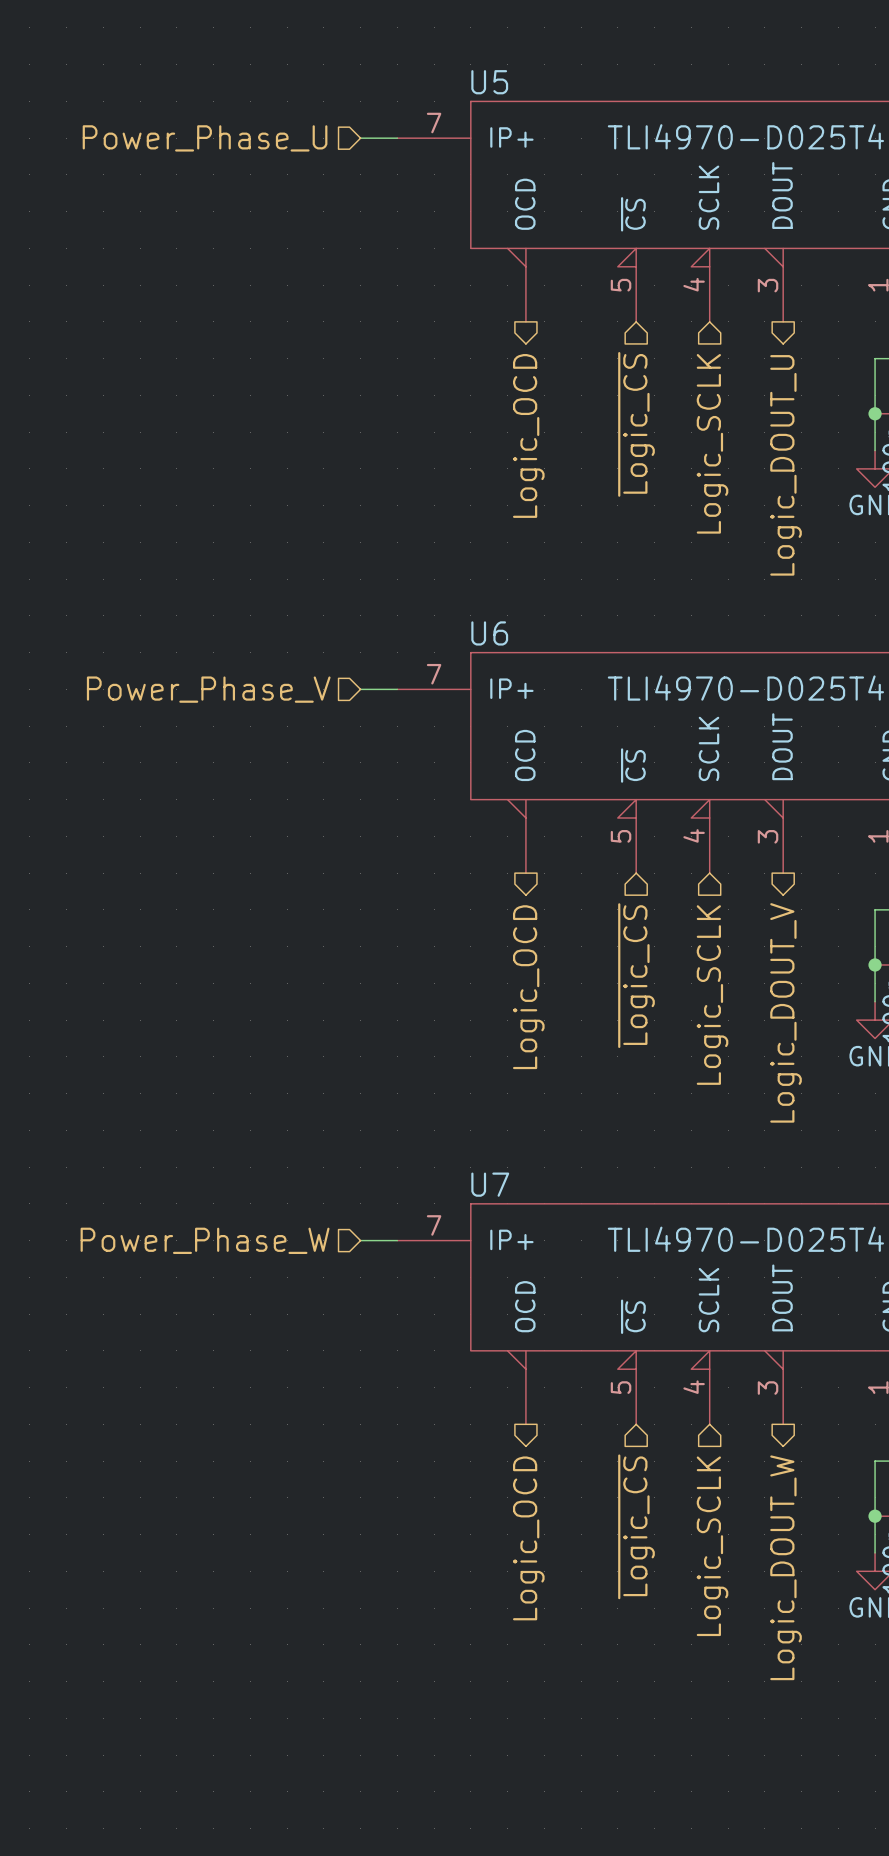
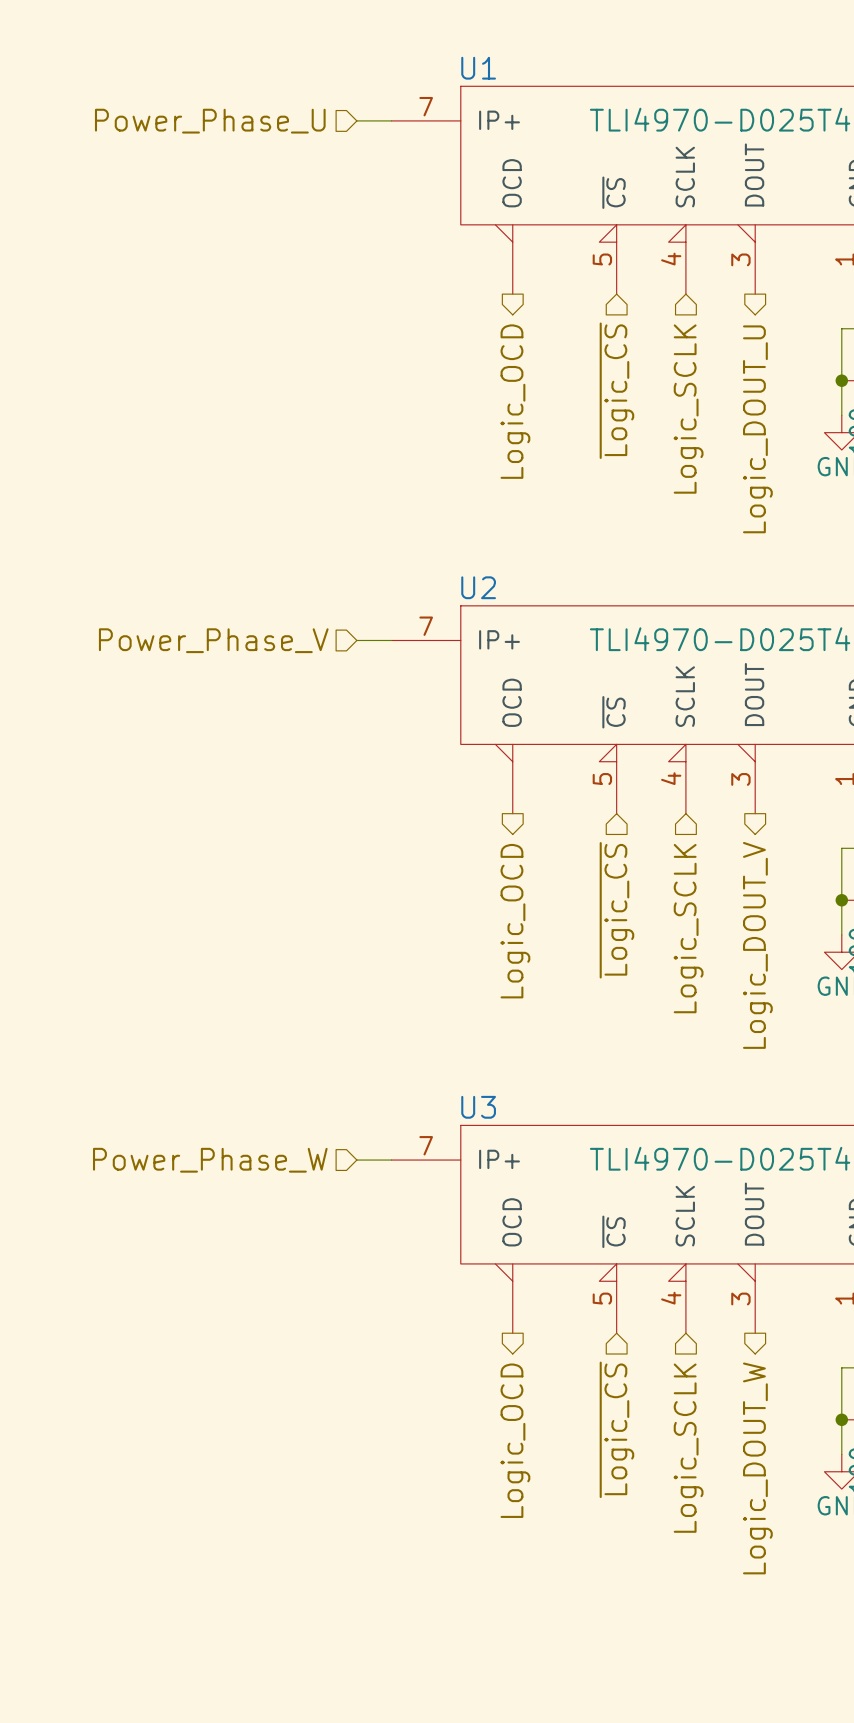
U5 name: U5 (489, 82) -> U1 (478, 68)
U6 name: U6 (489, 633) -> U2 (478, 587)
U7 name: U7 (490, 1184) -> U3 (478, 1107)

